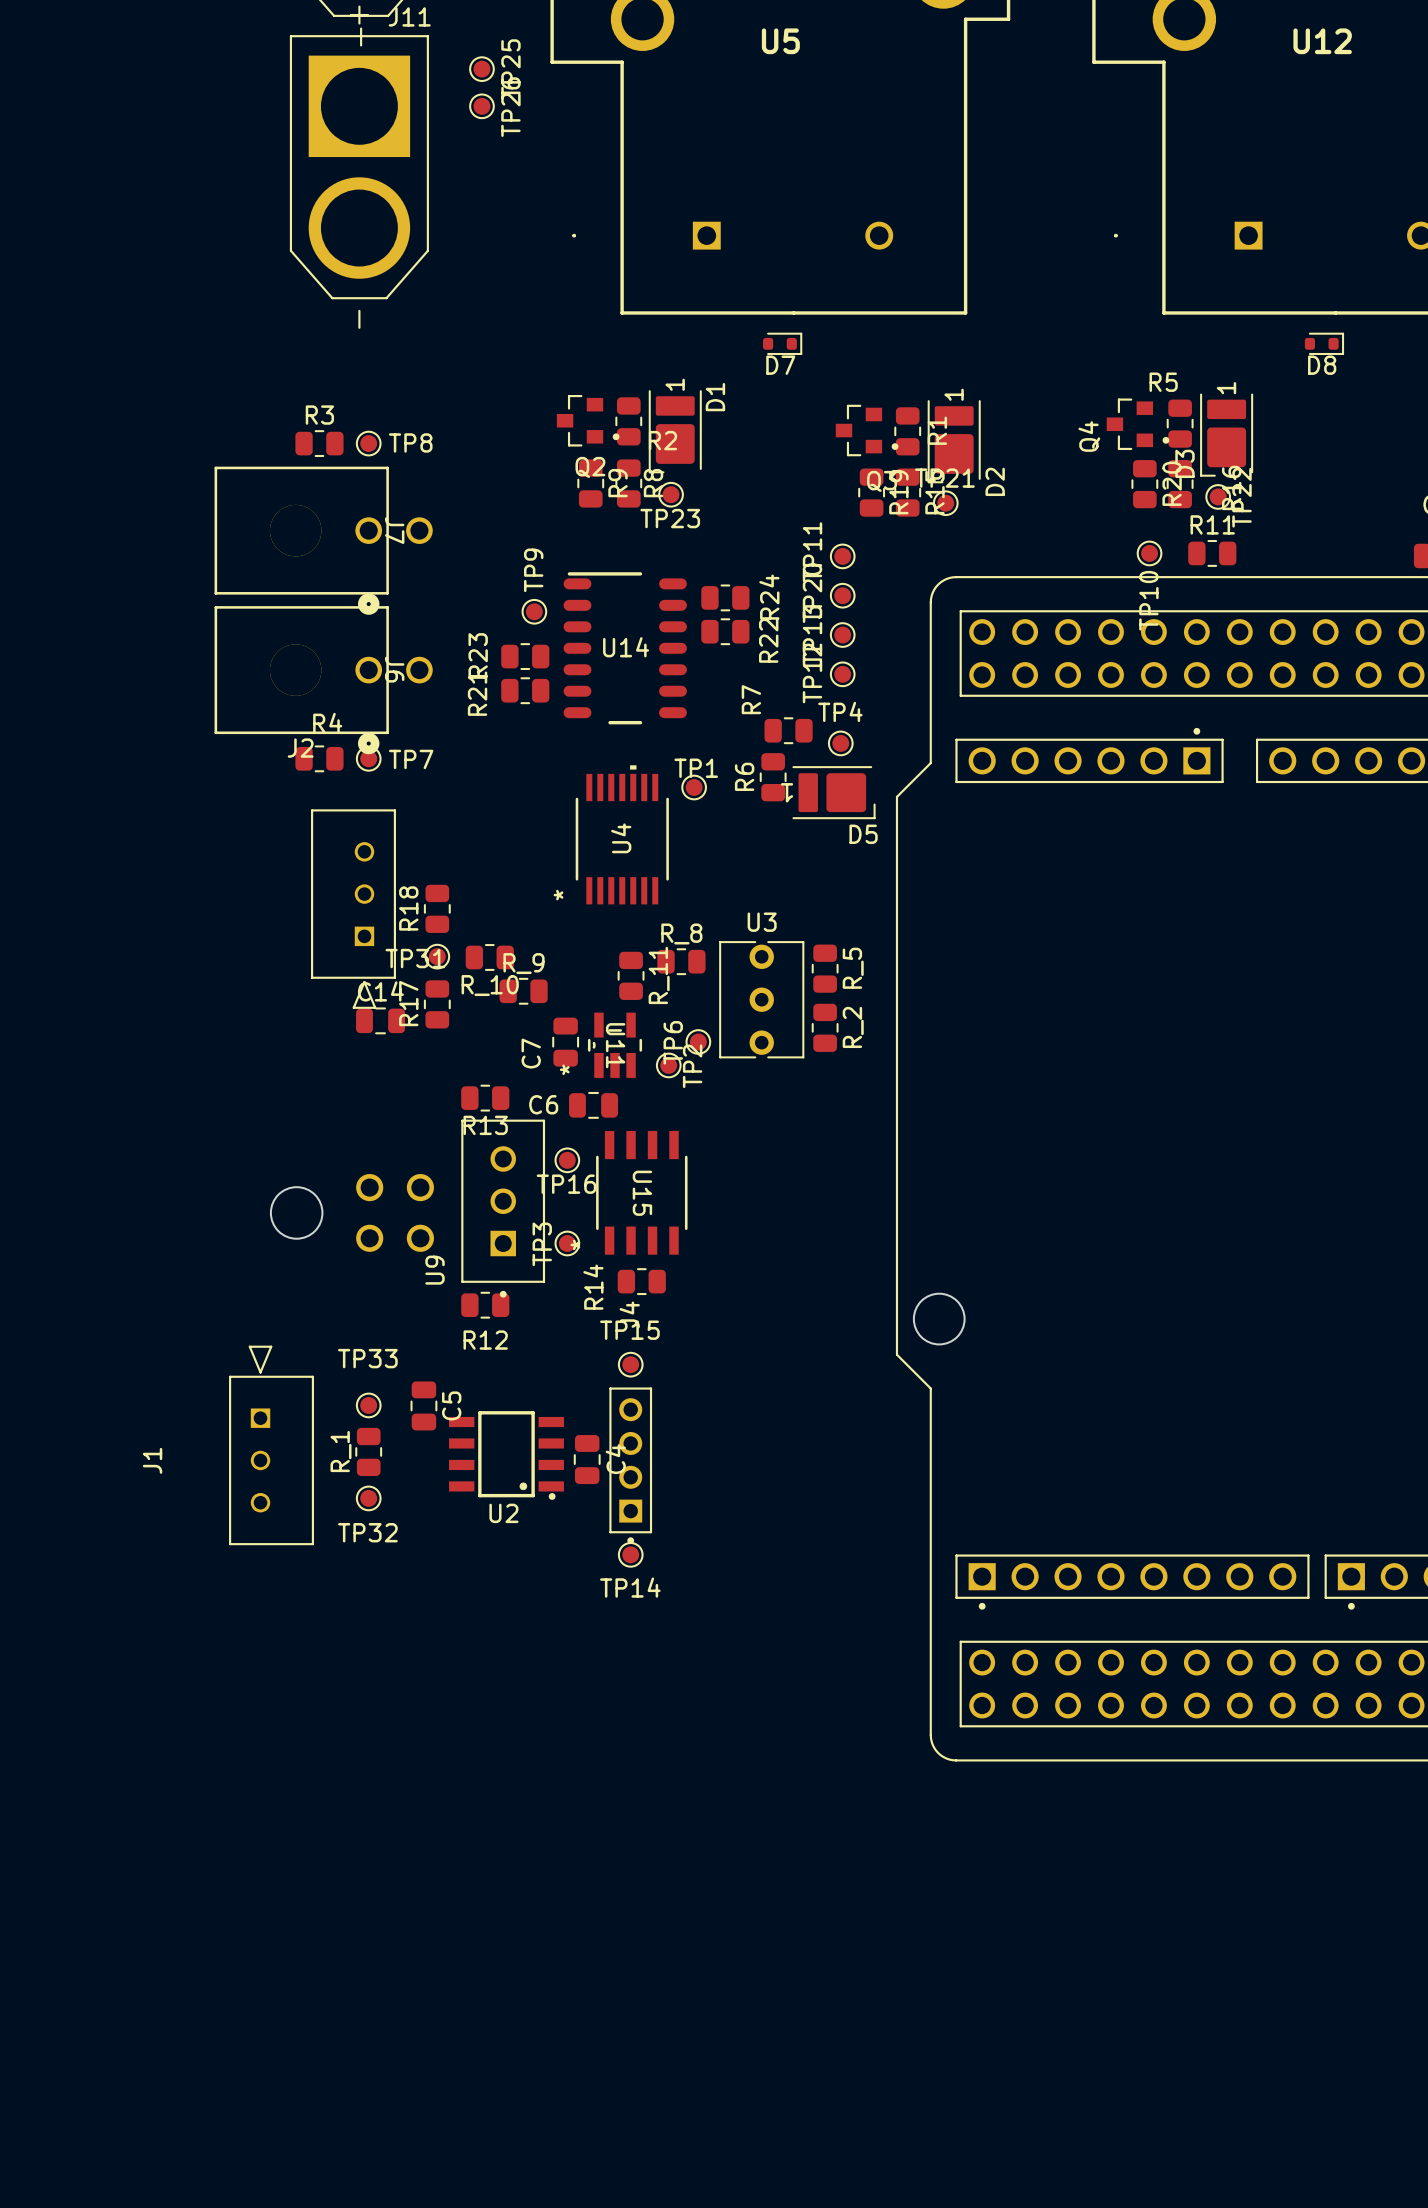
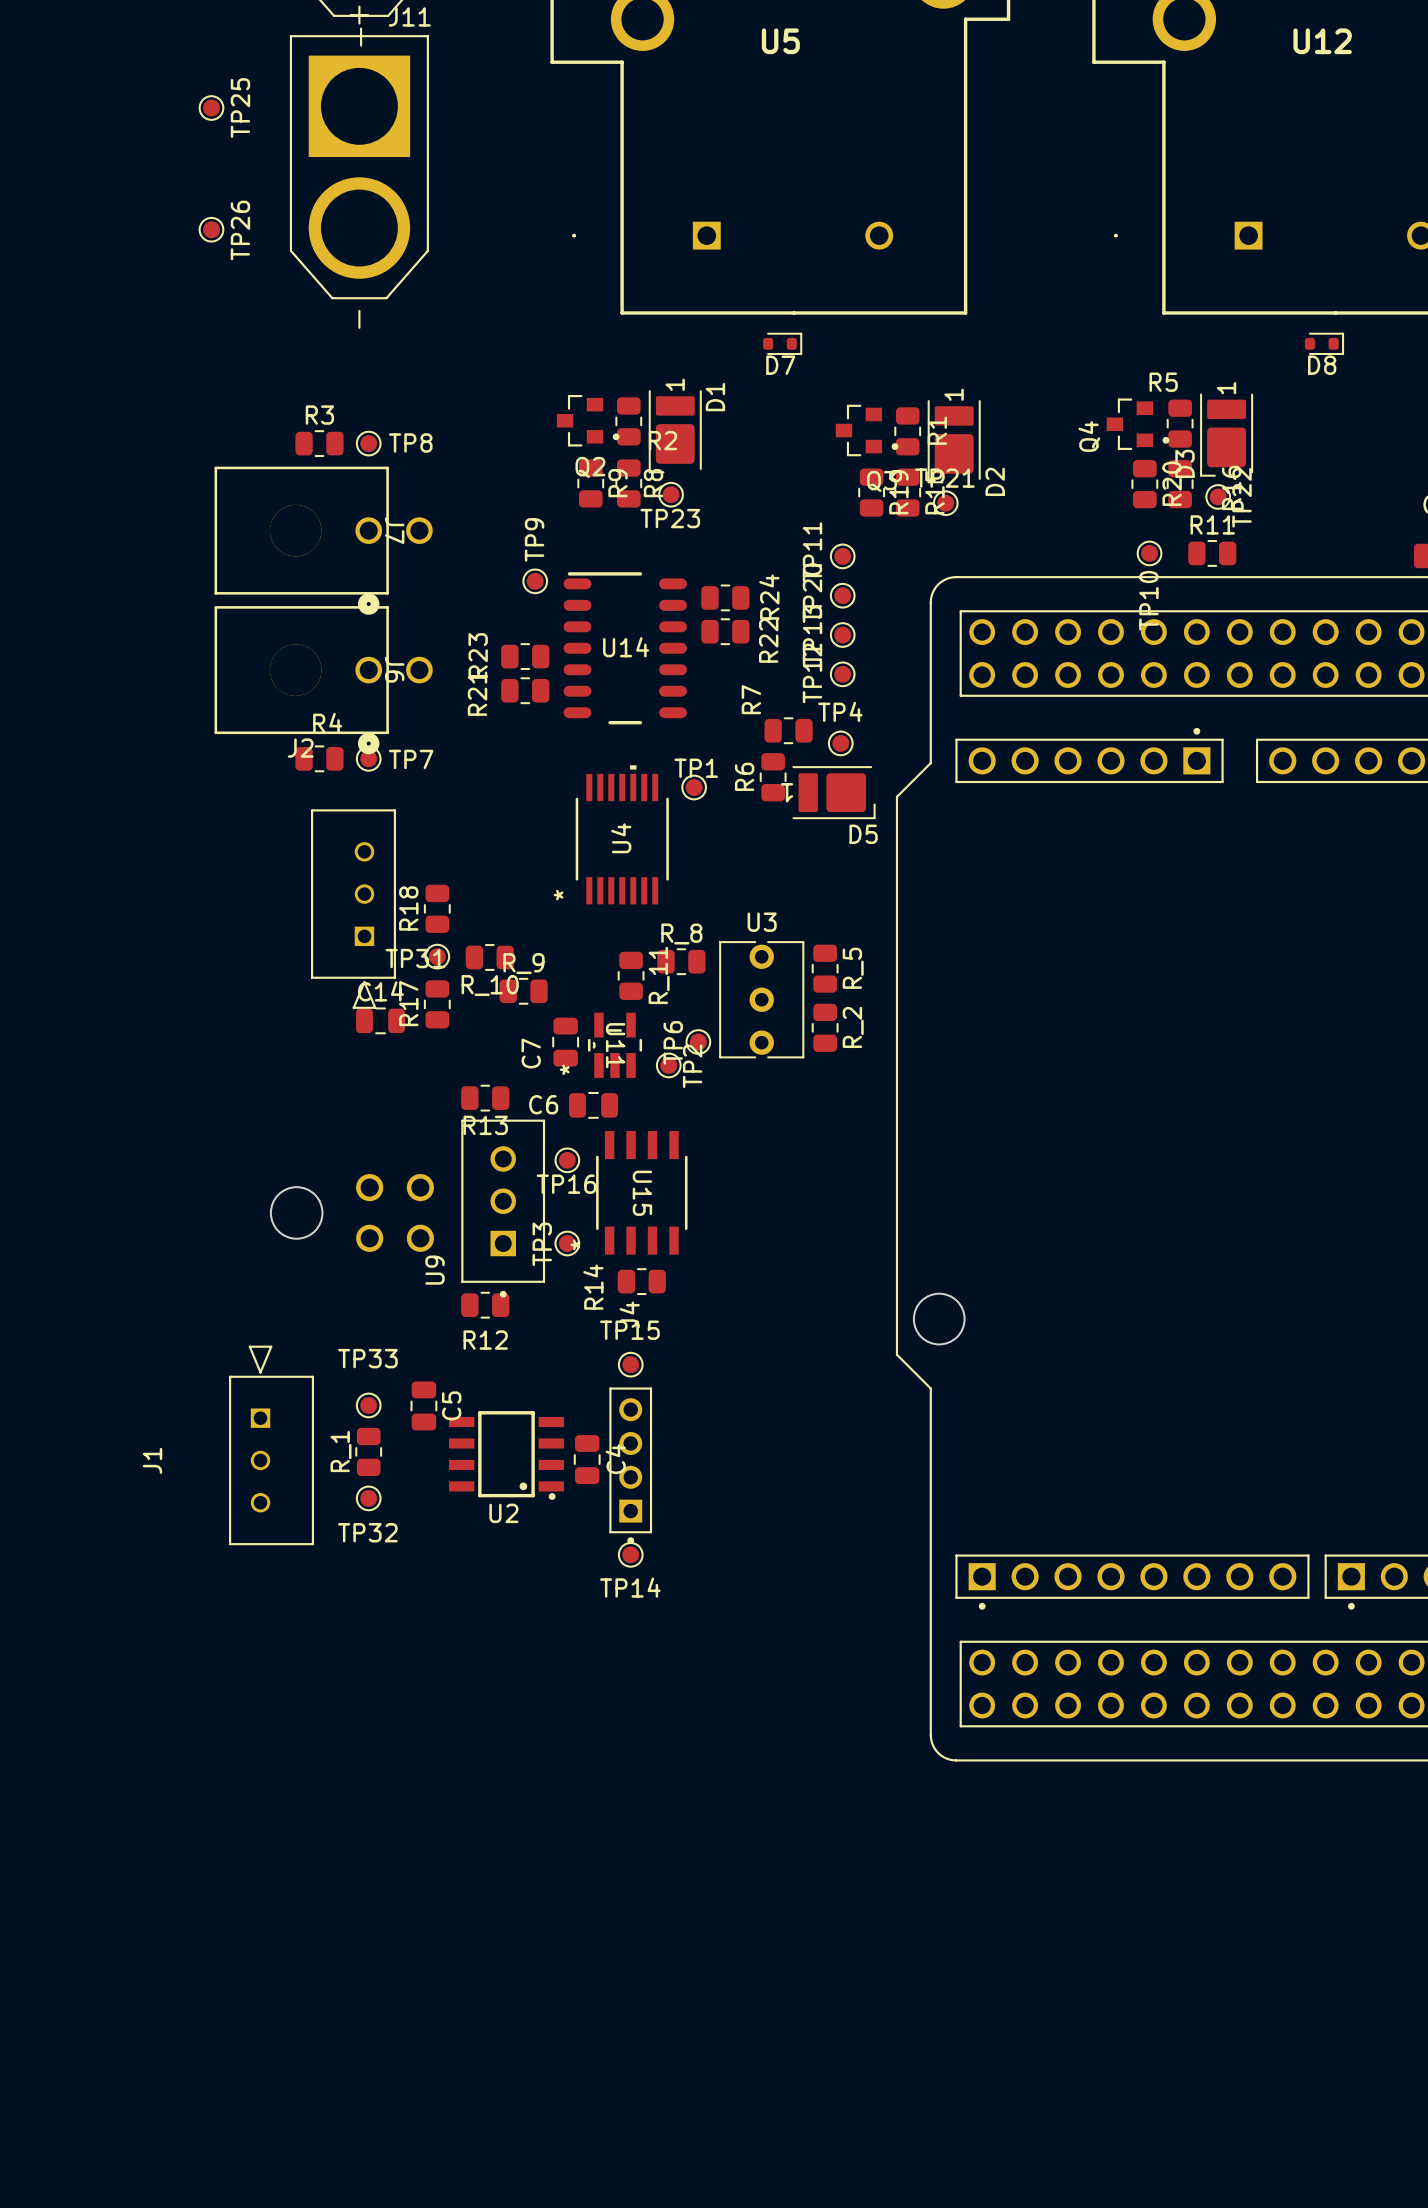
TP25 position: (481, 69) -> (211, 108)
TP26 position: (481, 106) -> (211, 229)
TP9 position: (534, 611) -> (535, 581)

